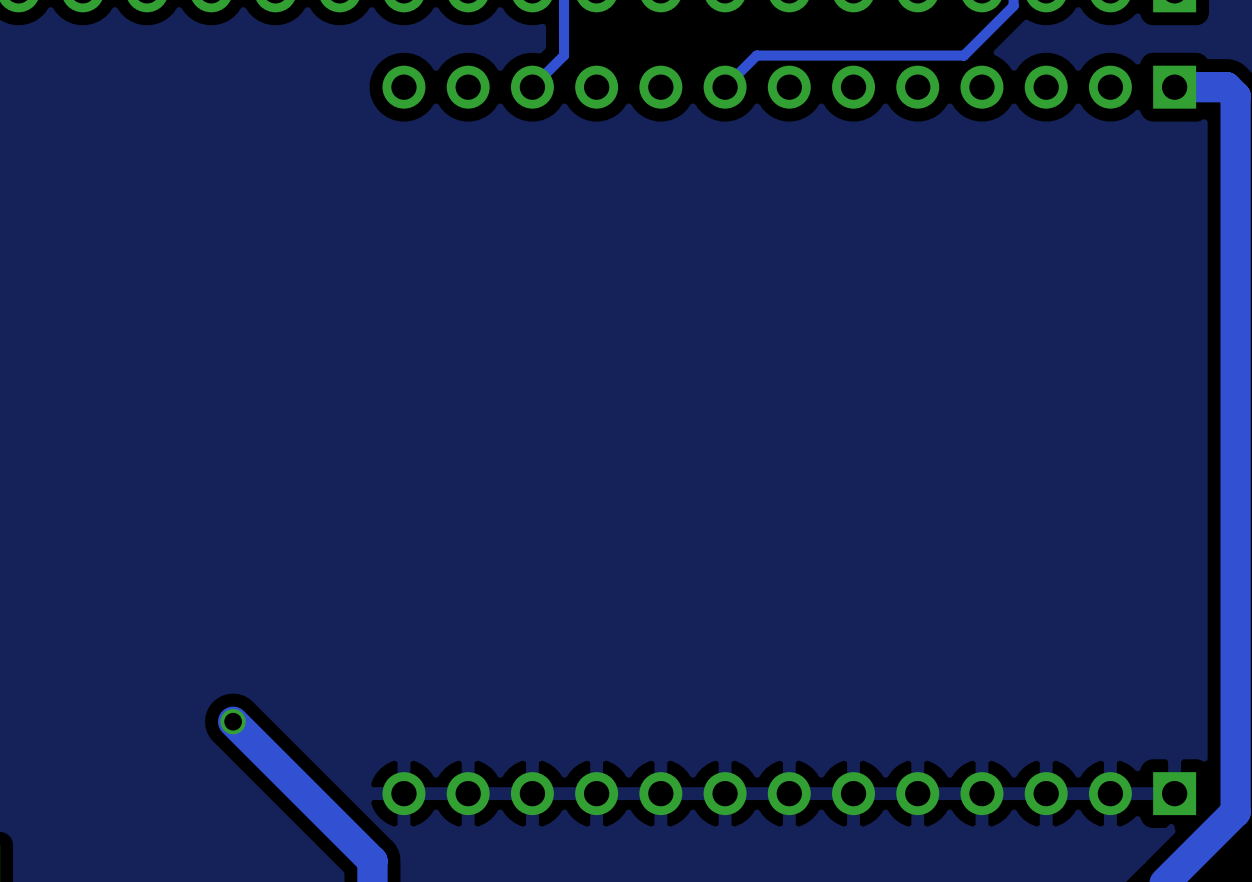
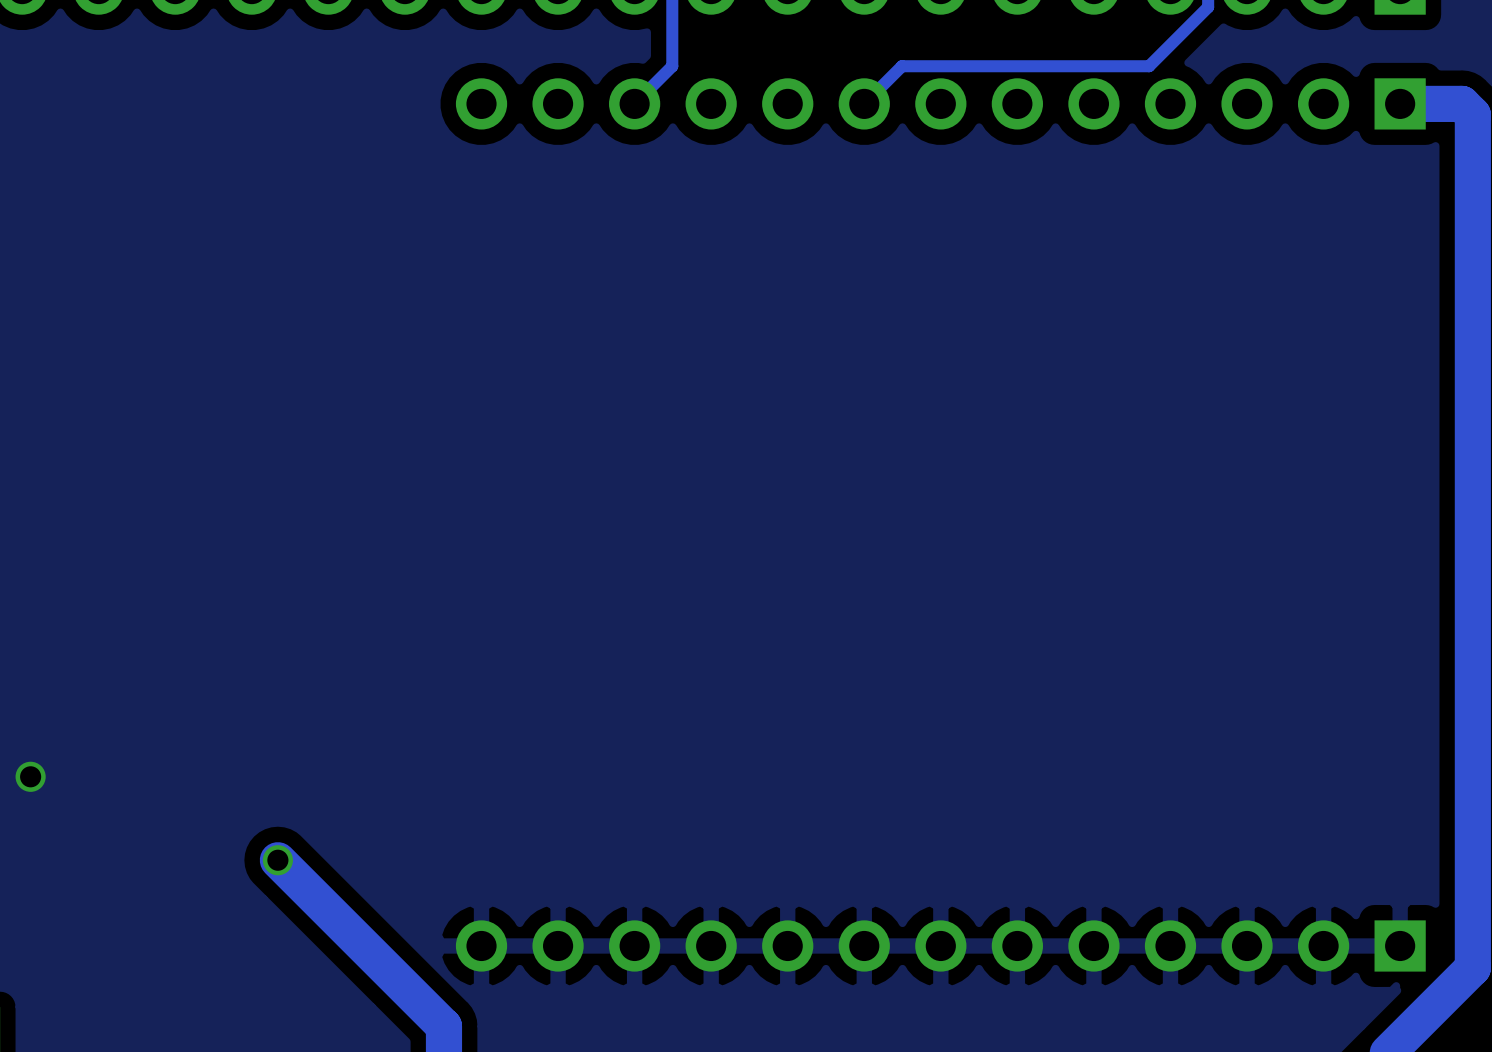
via: none -> (30, 776)

